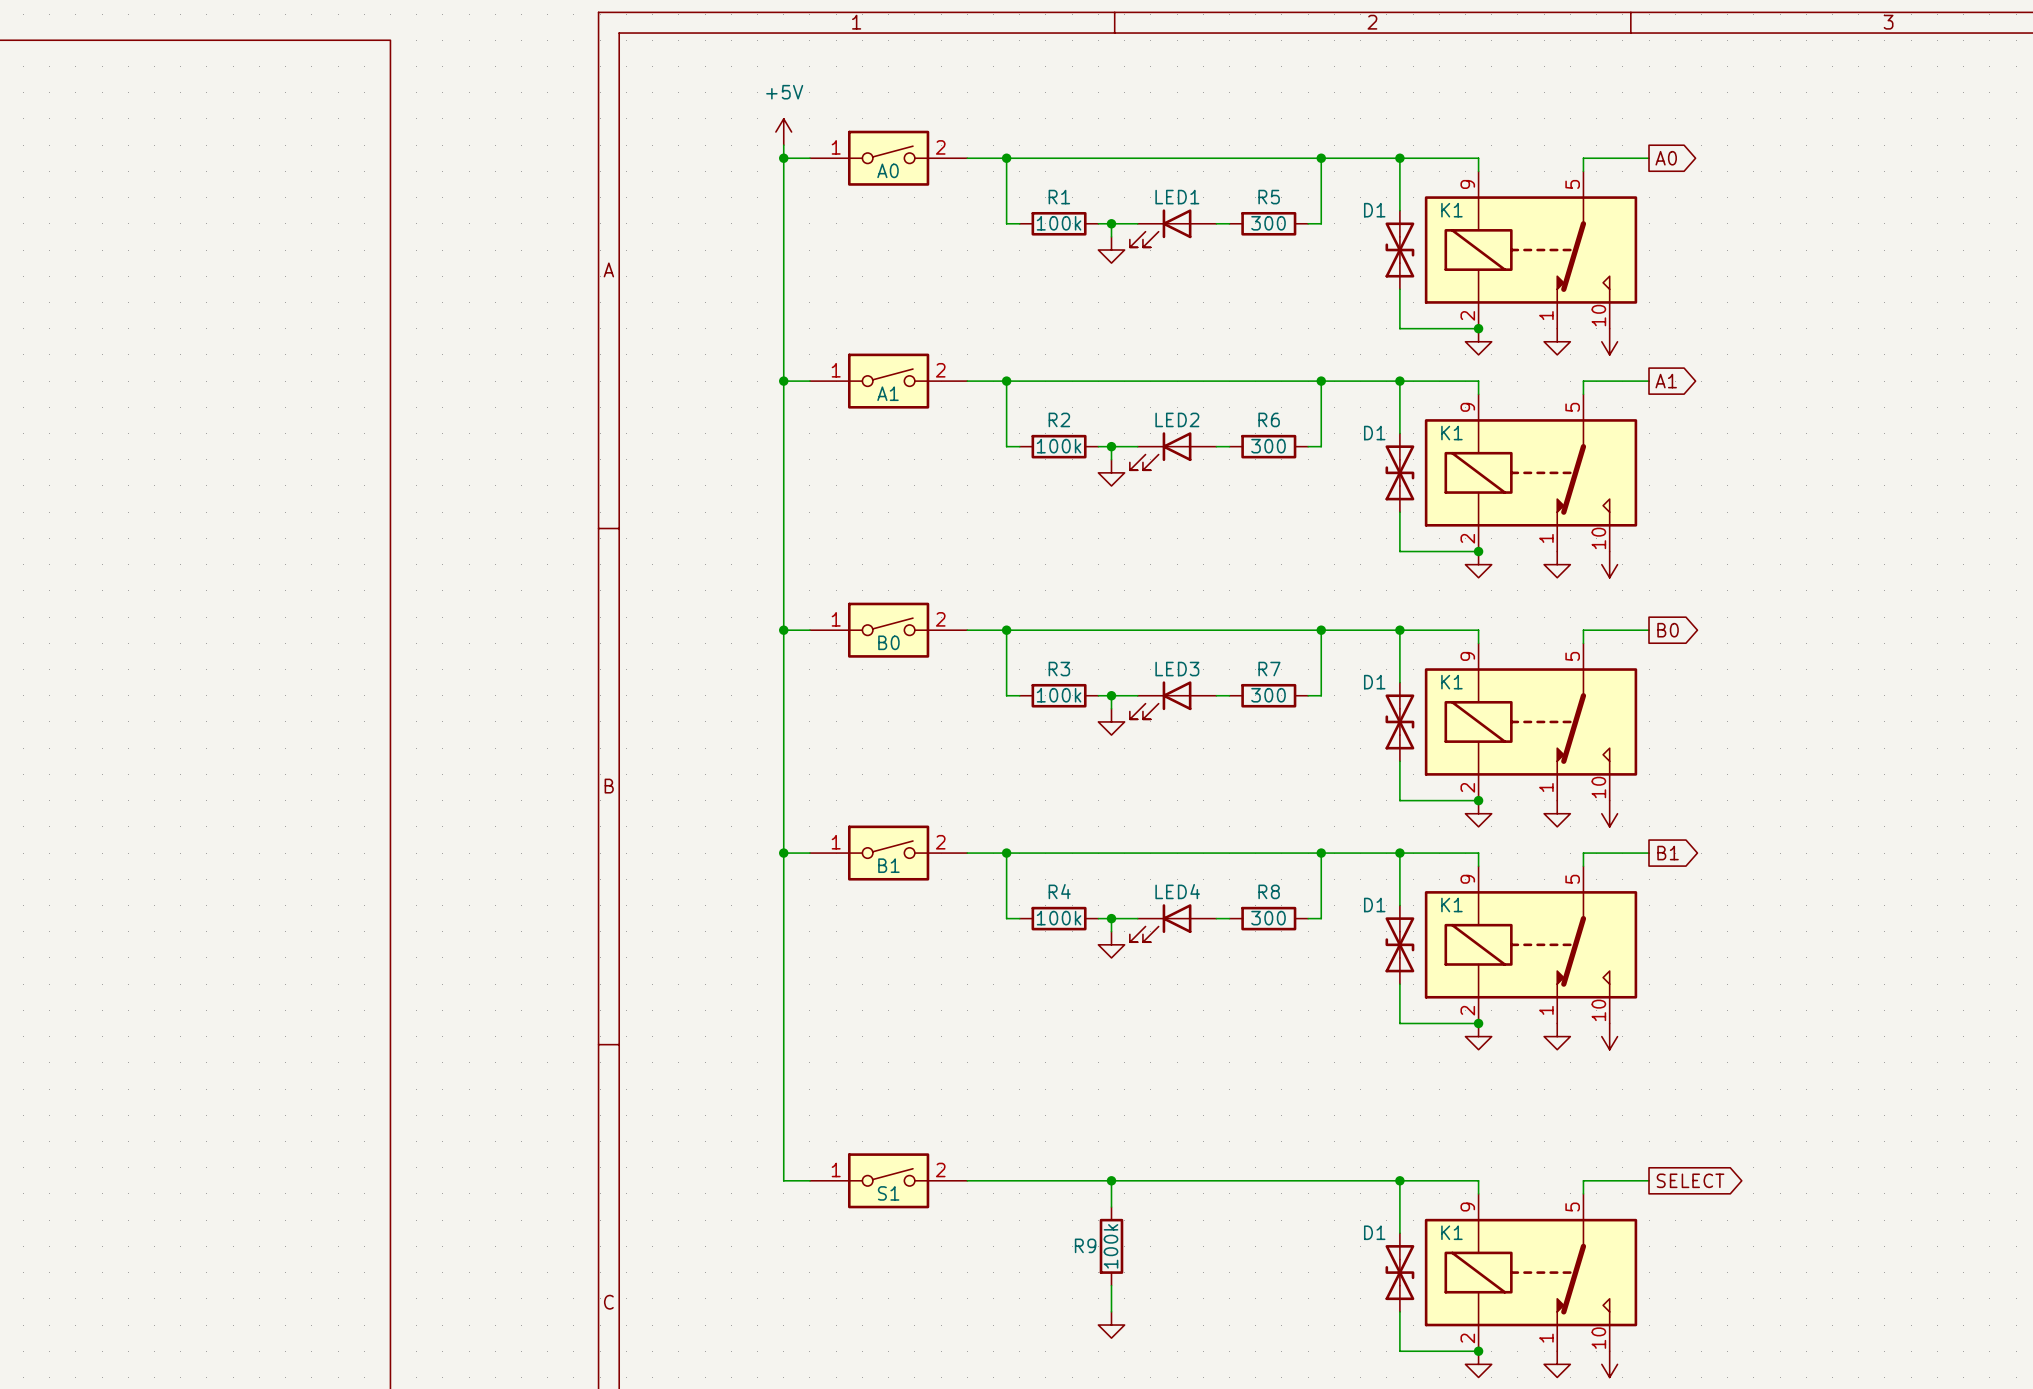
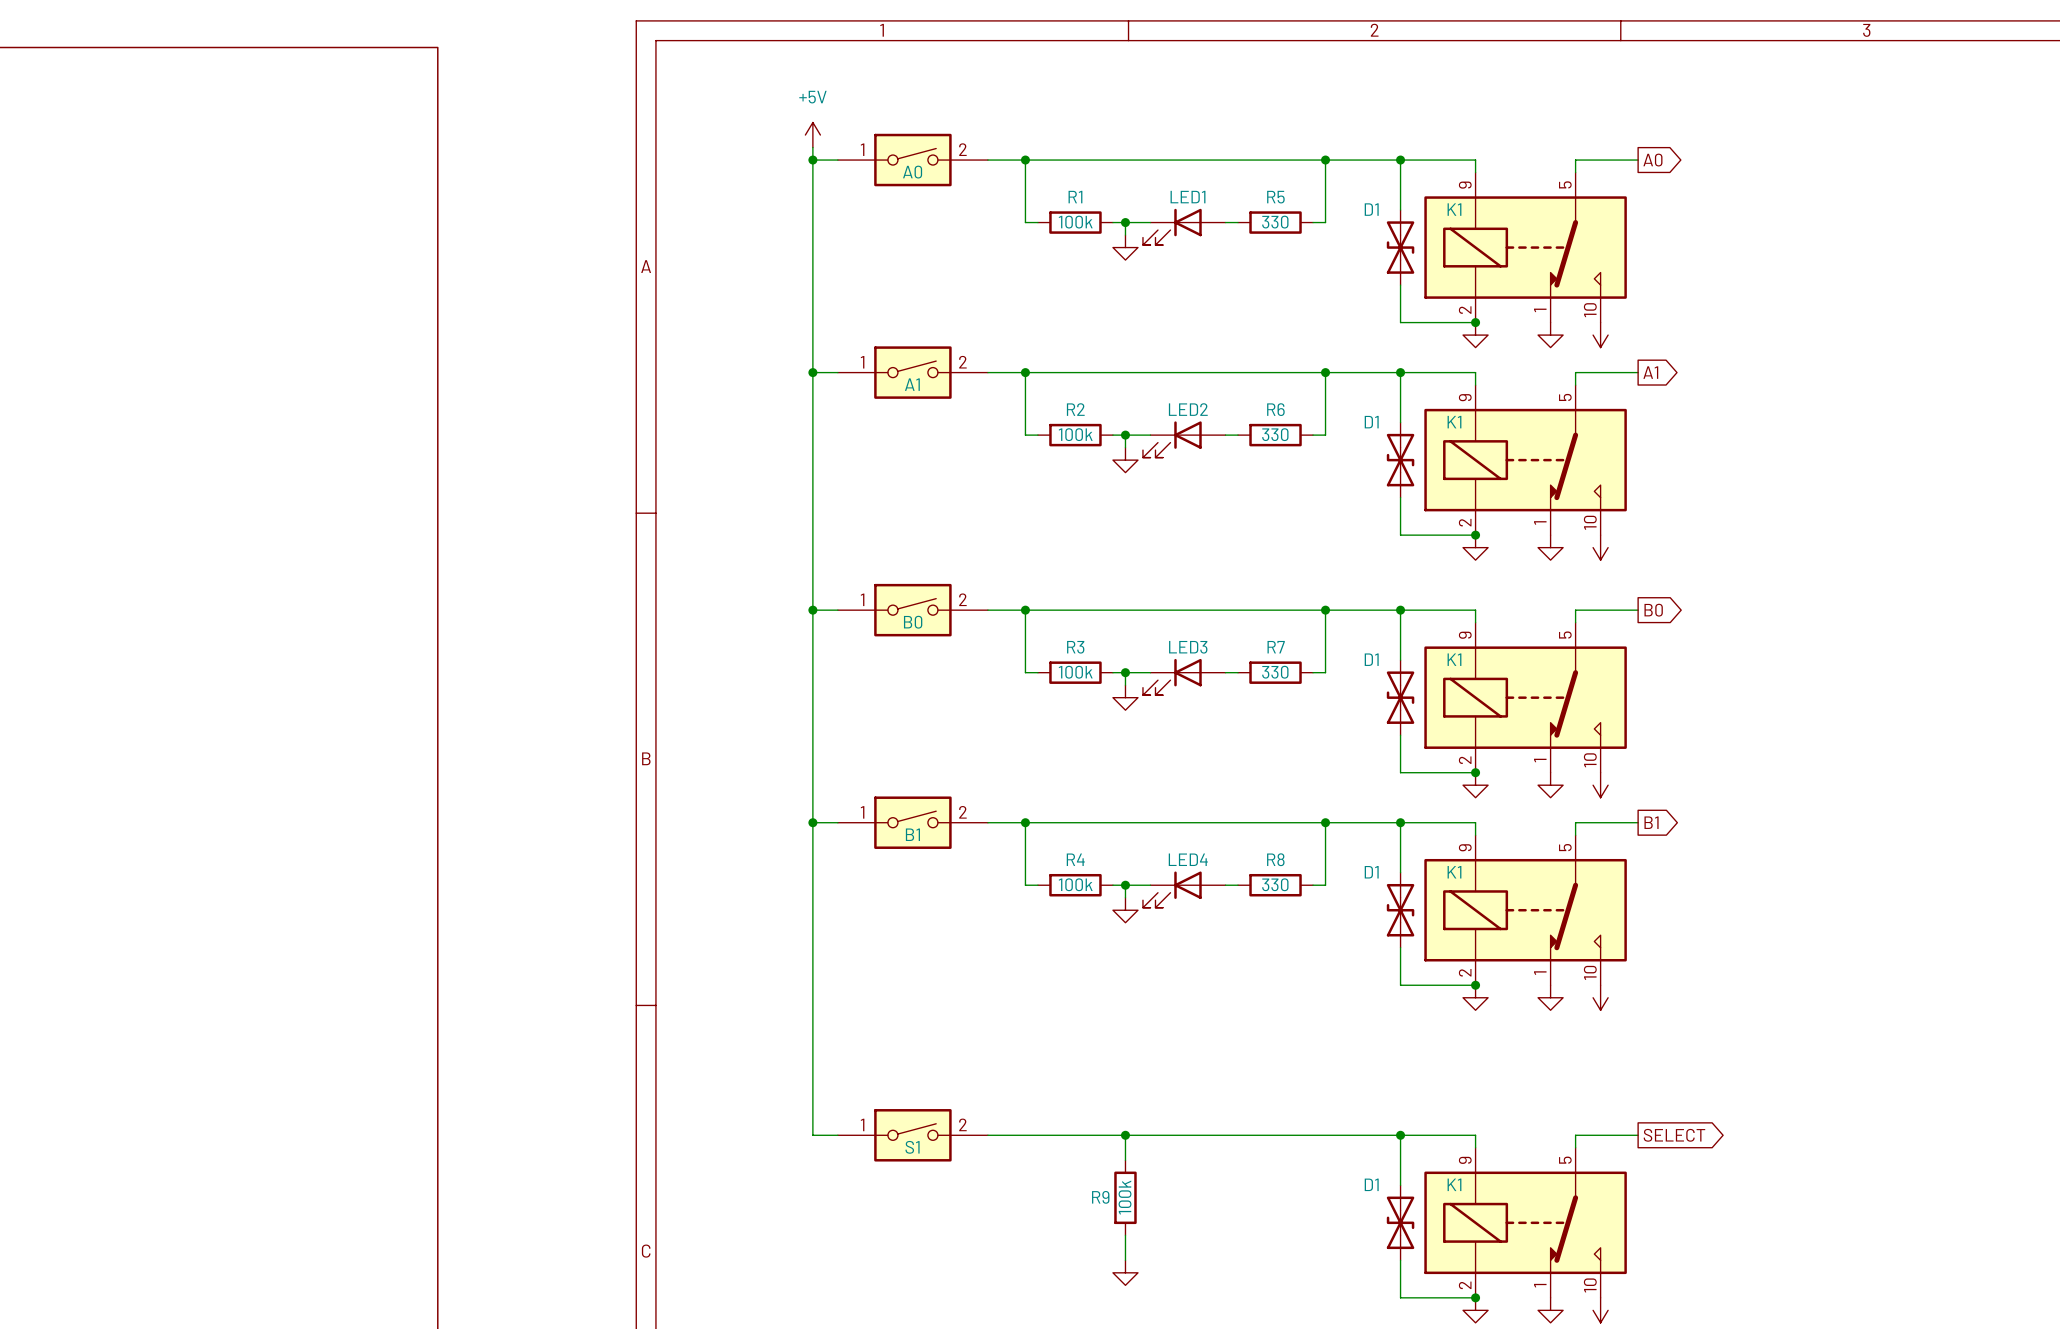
R5 value: 300 (1268, 223) -> 330 (1275, 222)
R6 value: 300 (1268, 446) -> 330 (1275, 434)
R7 value: 300 (1268, 695) -> 330 (1275, 672)
R8 value: 300 (1268, 918) -> 330 (1275, 884)

